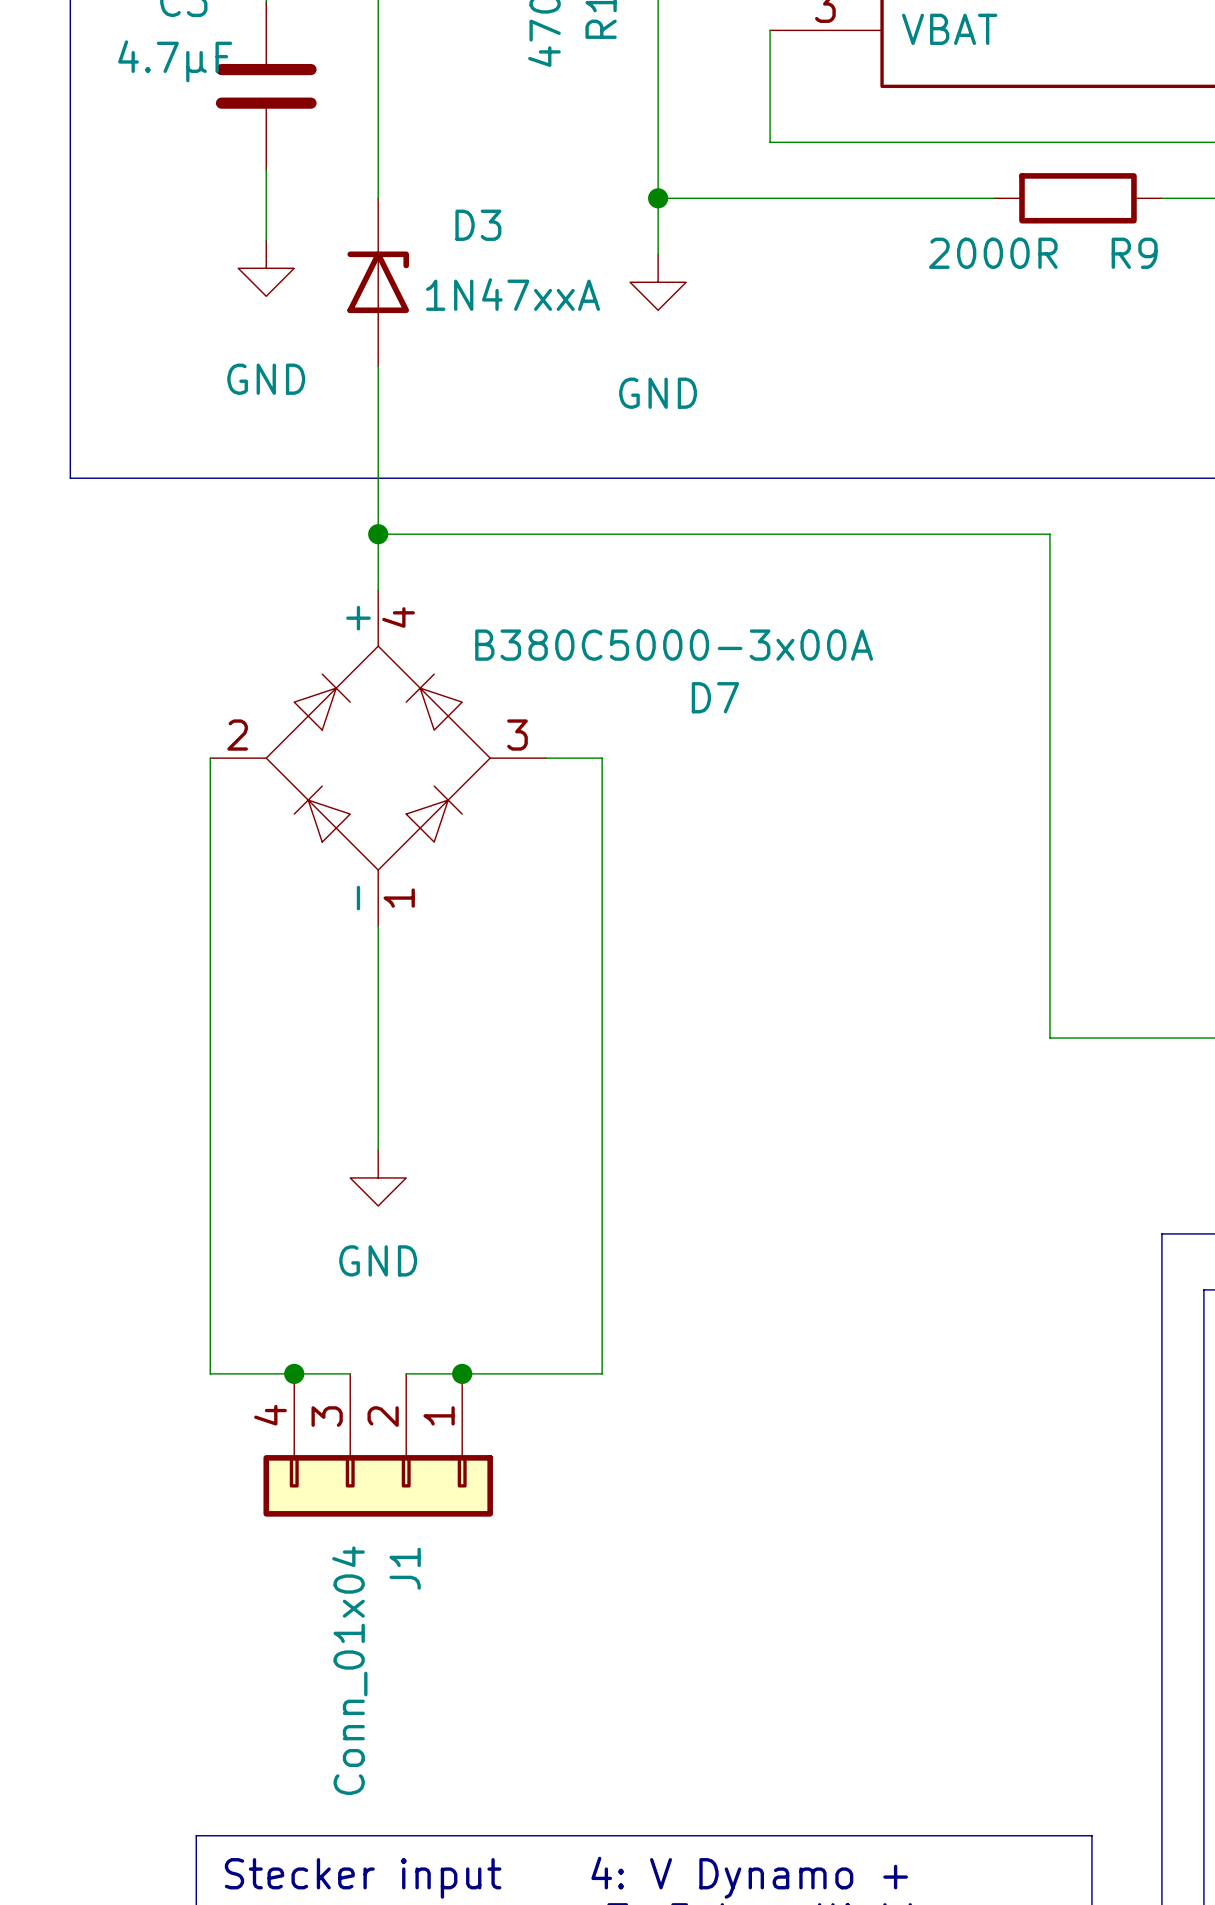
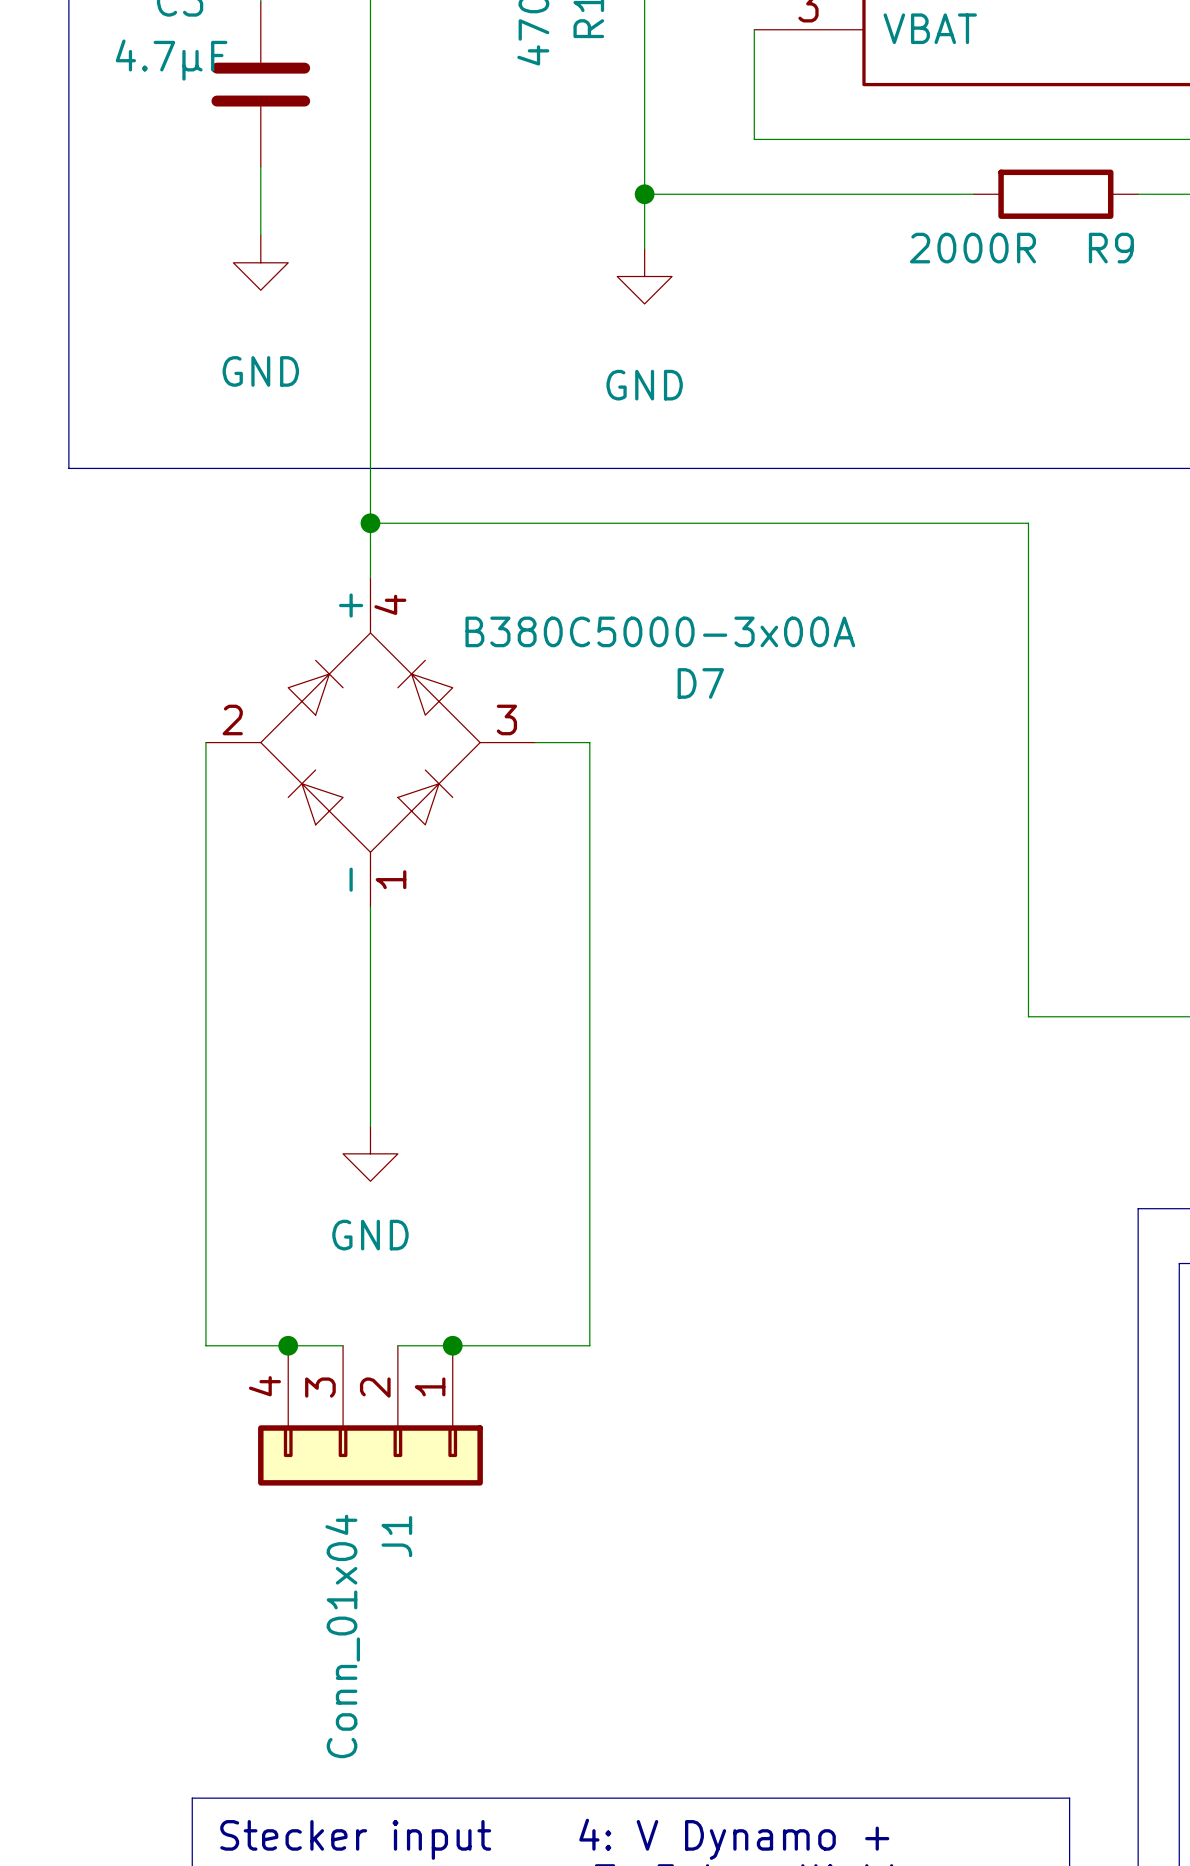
D3: 1N47xxA (378, 282) -> none

